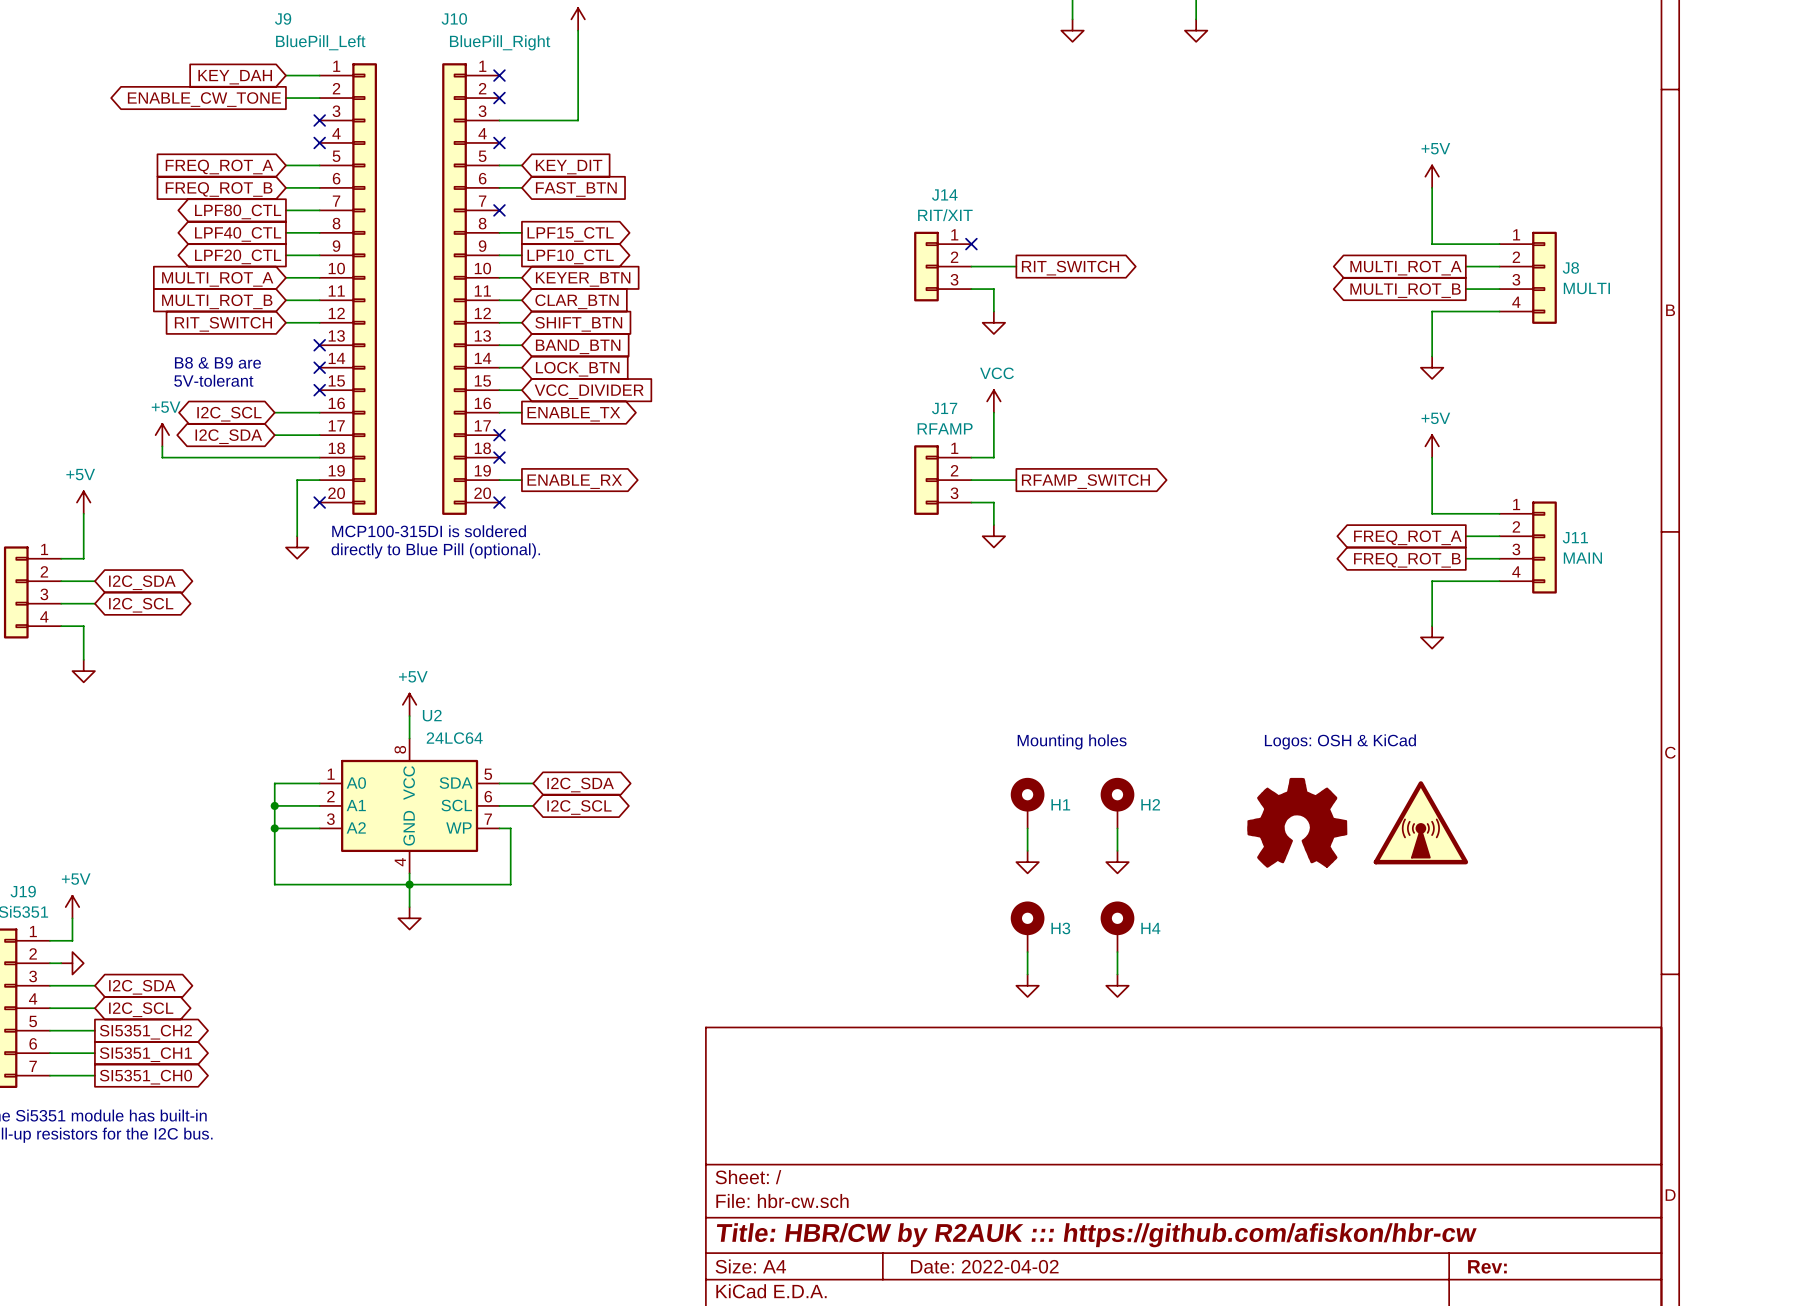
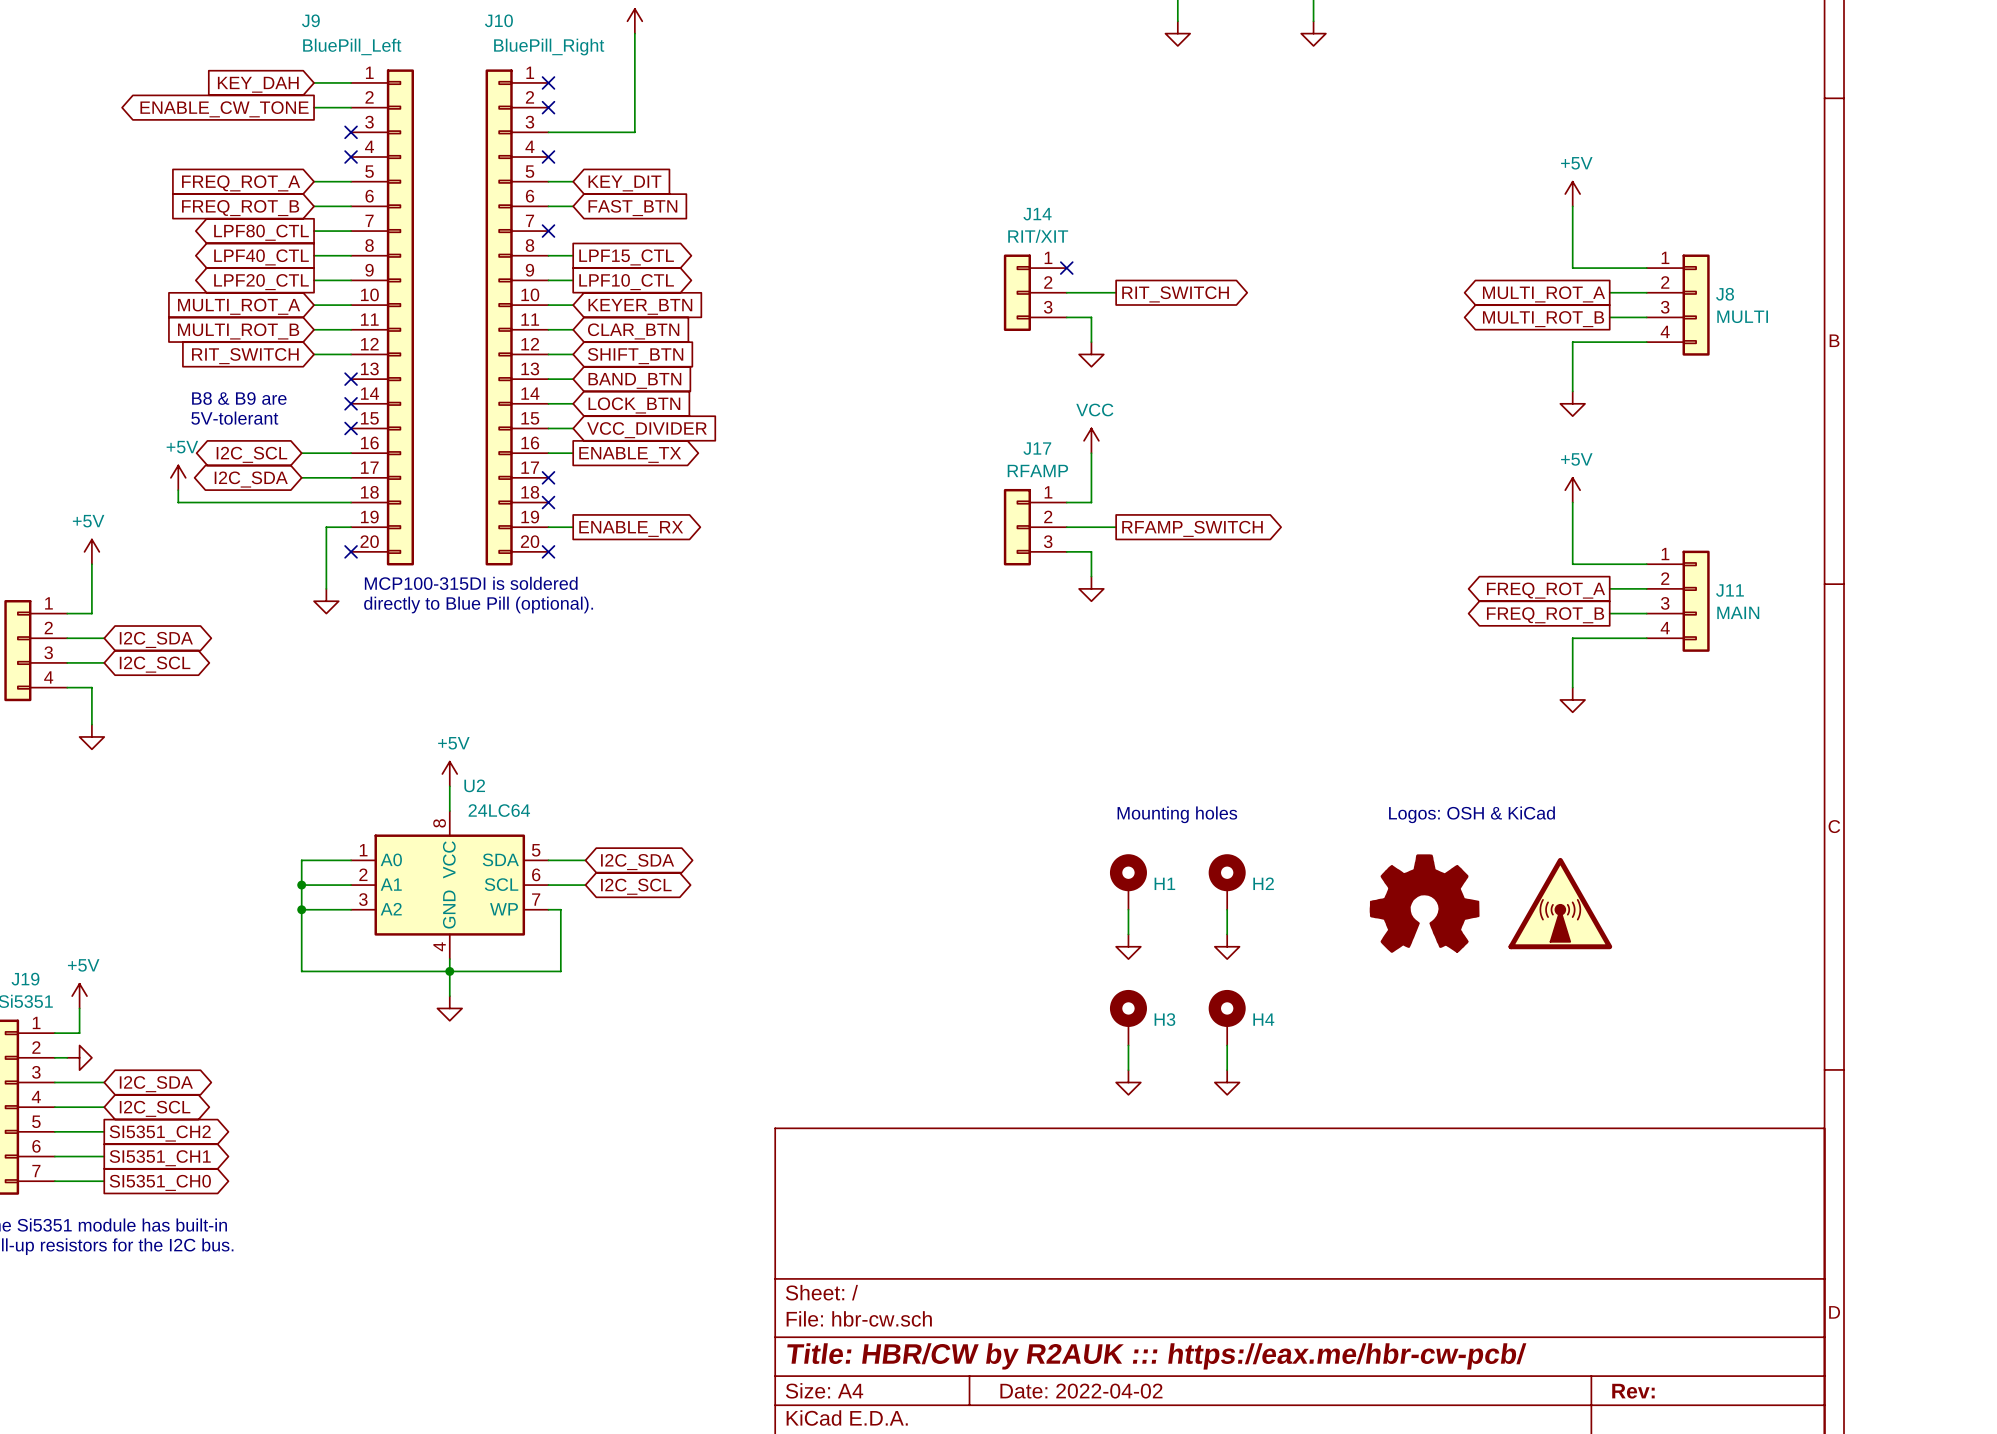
title block: Title: HBR/CW by R2AUK ::: https://github.com/afiskon/hbr-cw (1096, 1235) -> Title: HBR/CW by R2AUK ::: https://eax.me/hbr-cw-pcb/ (1156, 1356)

